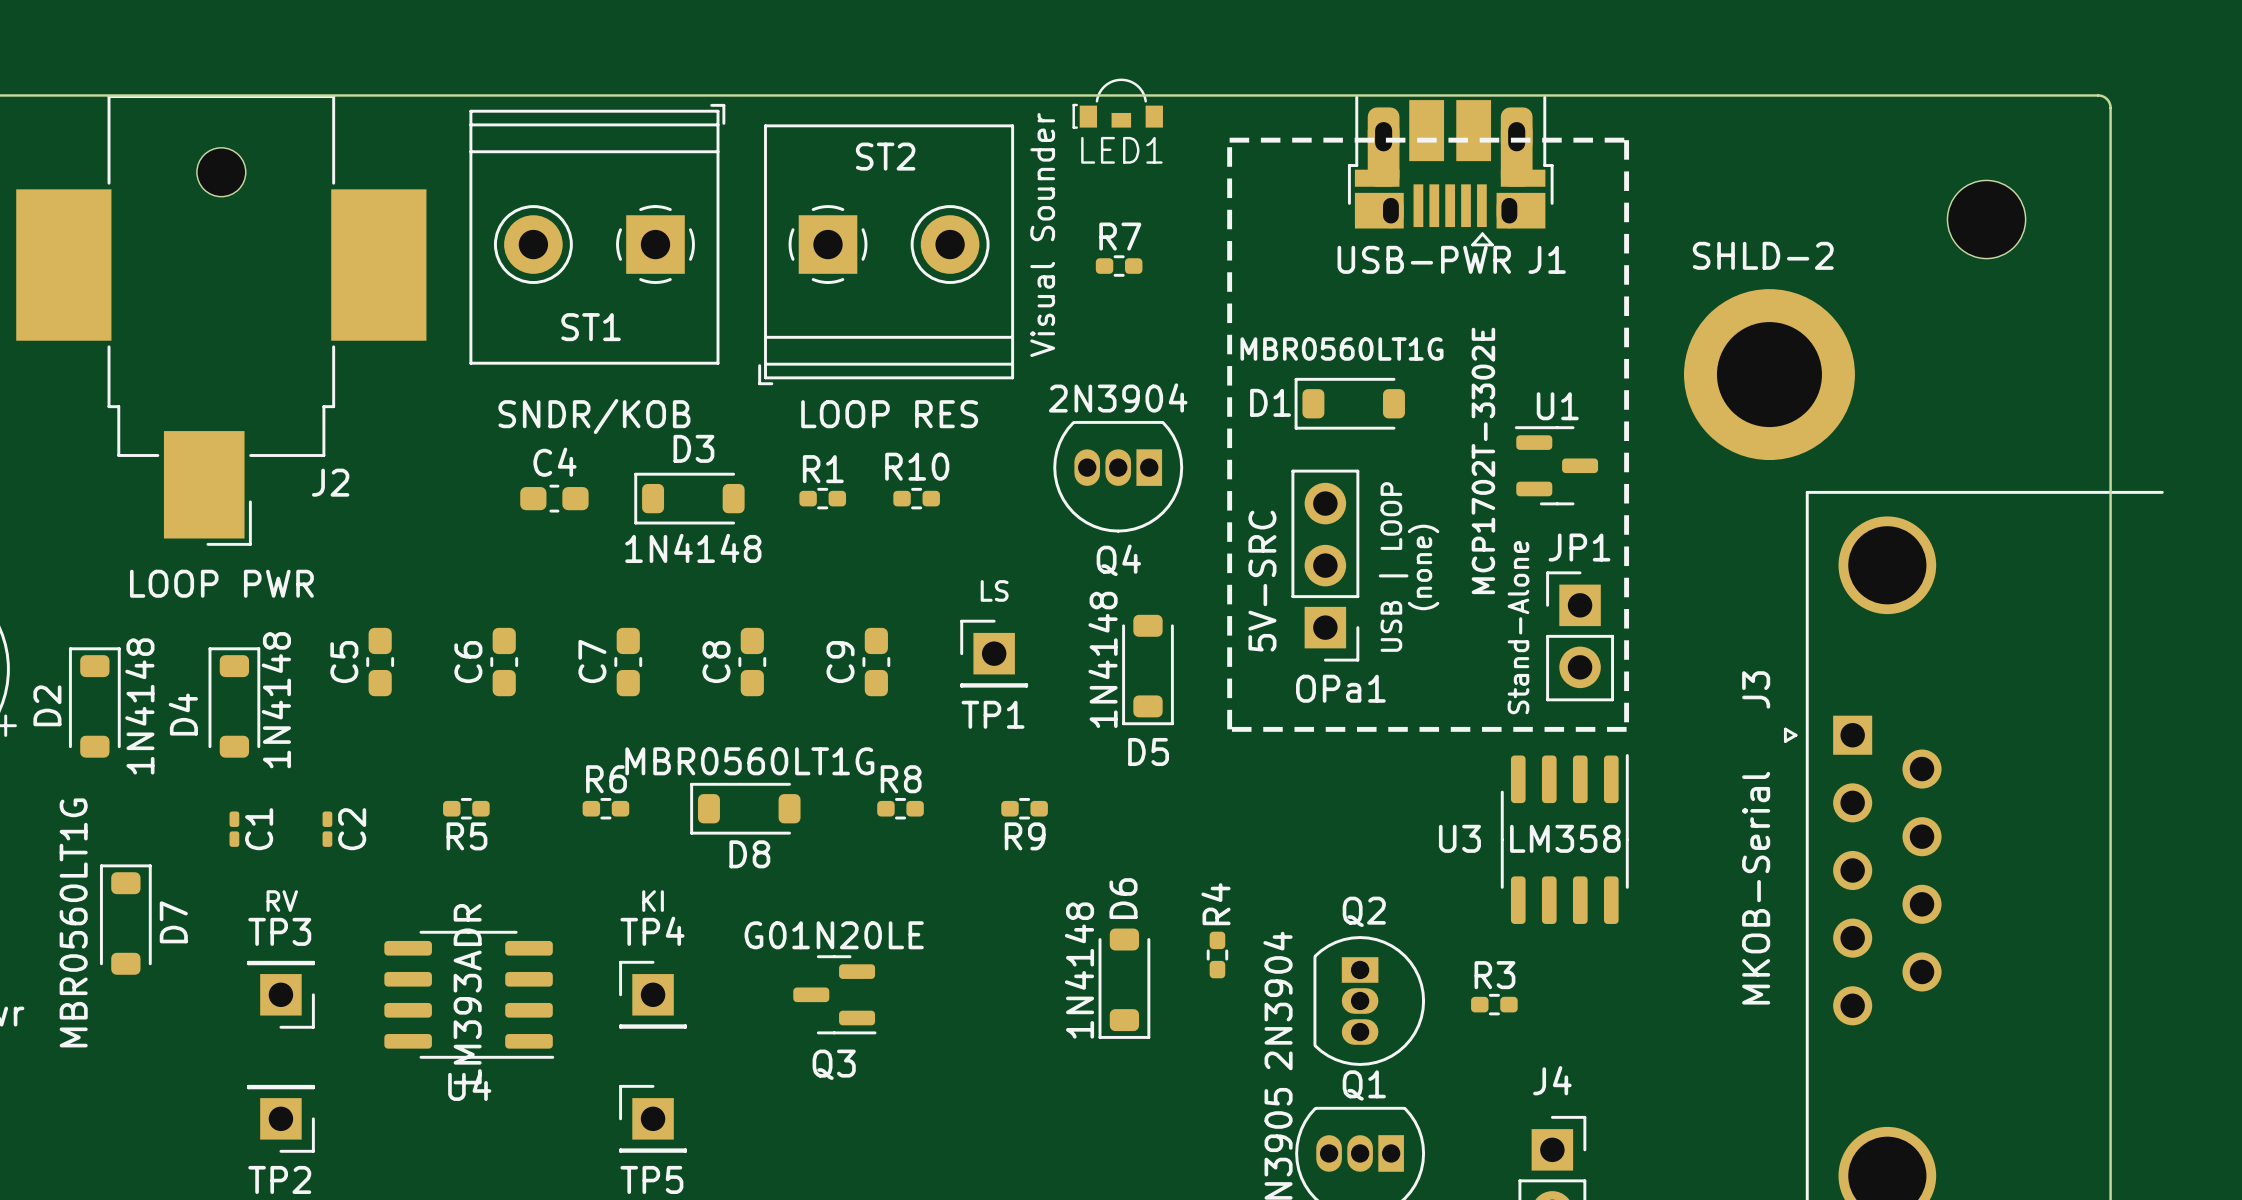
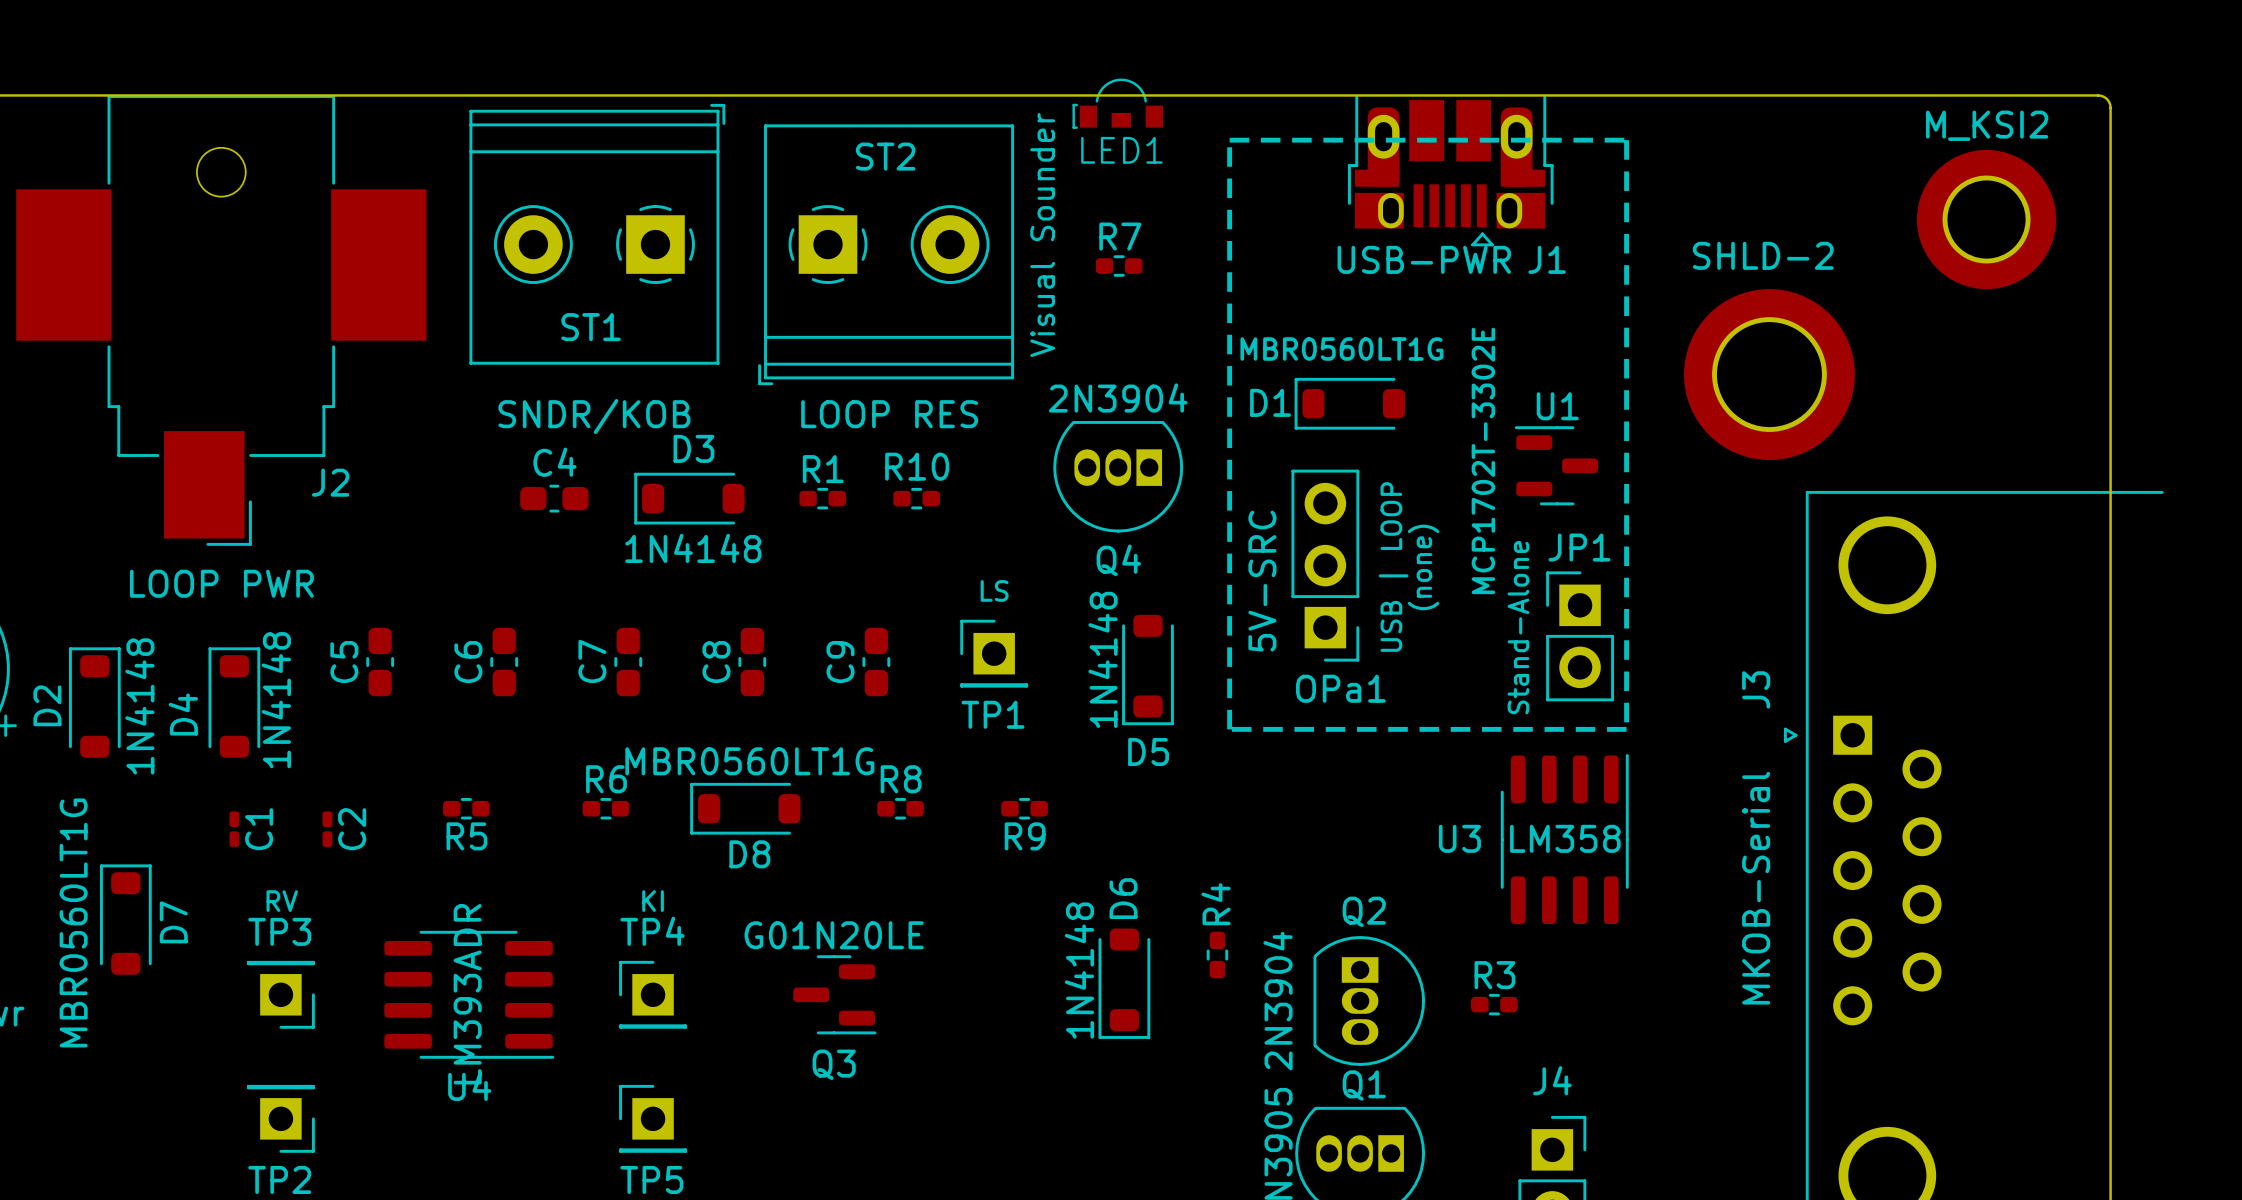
part: (1986, 219) -> none
M_KSI2: none -> (1986, 219)

